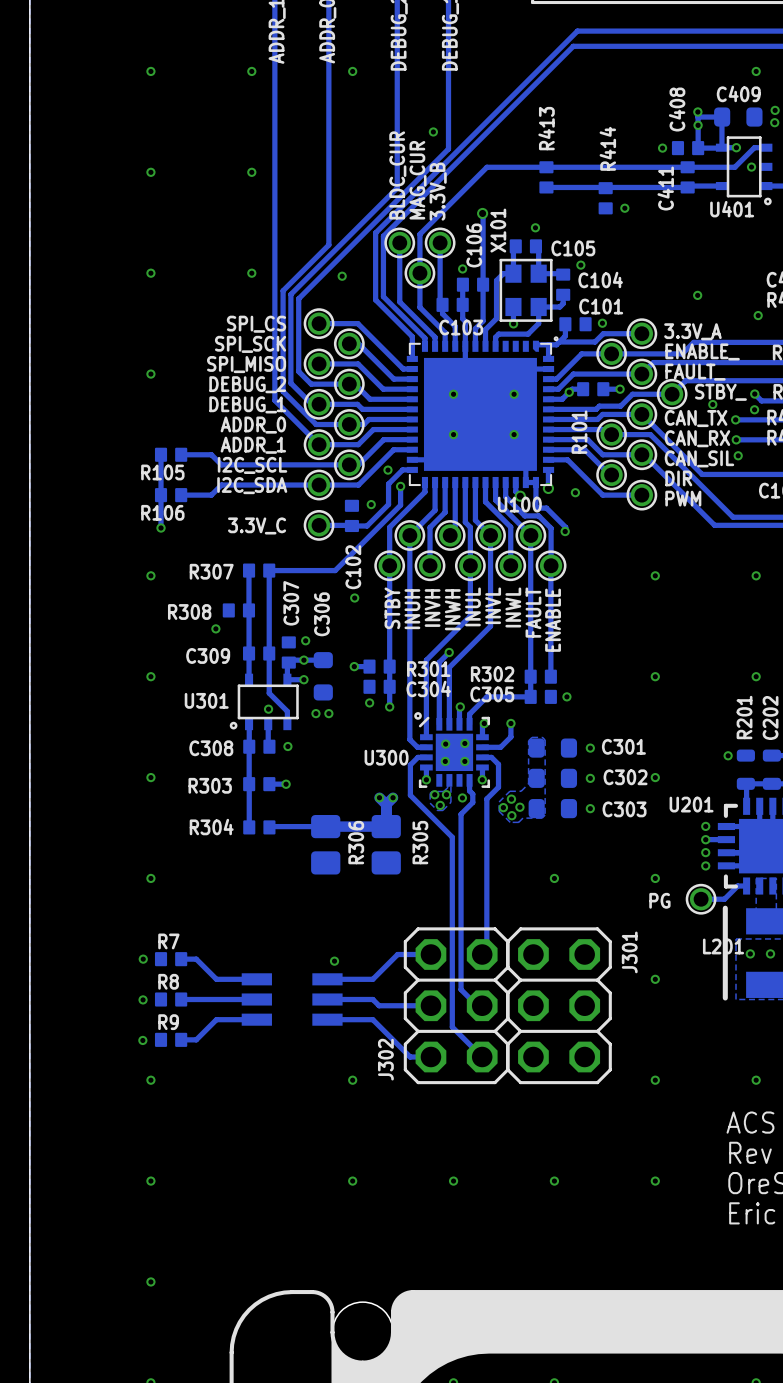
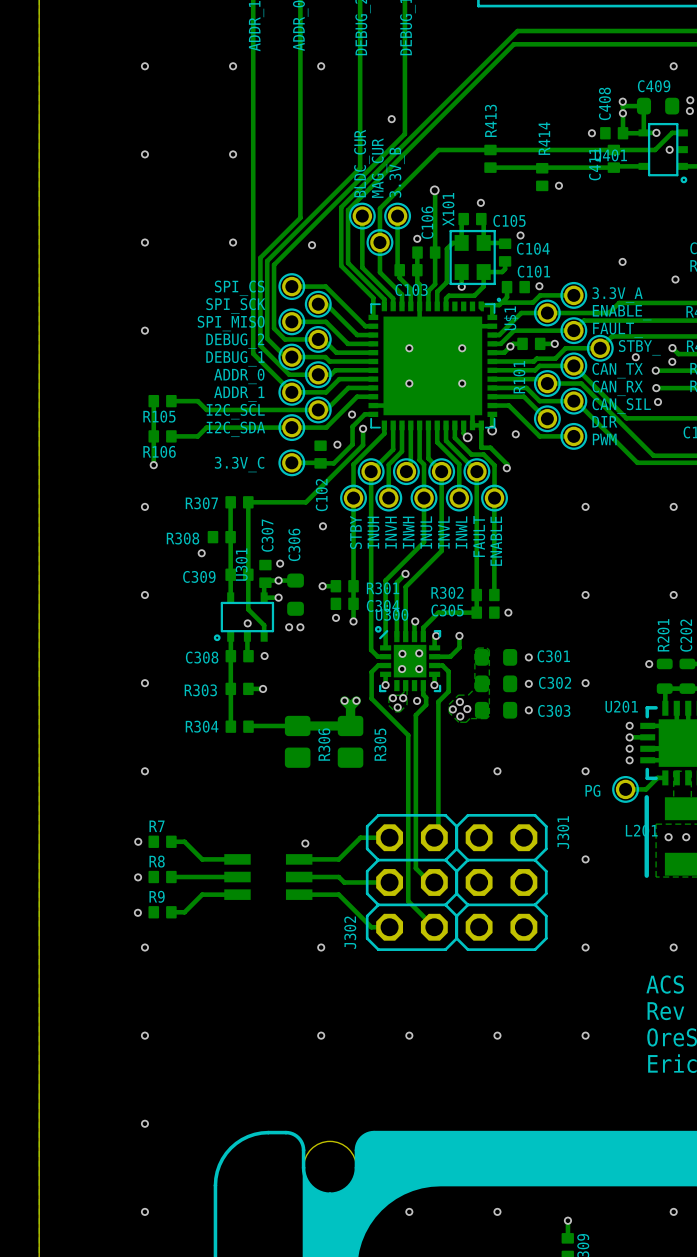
U401 name position: U401 (732, 209) -> U401 (610, 155)
U100 name: U100 (519, 504) -> U$1 (511, 318)
U301 name rotation: 0° (206, 700) -> 90° counterclockwise (241, 564)
U301 name position: U301 (206, 700) -> U301 (241, 564)
U300 name position: U300 (386, 757) -> U300 (392, 614)

